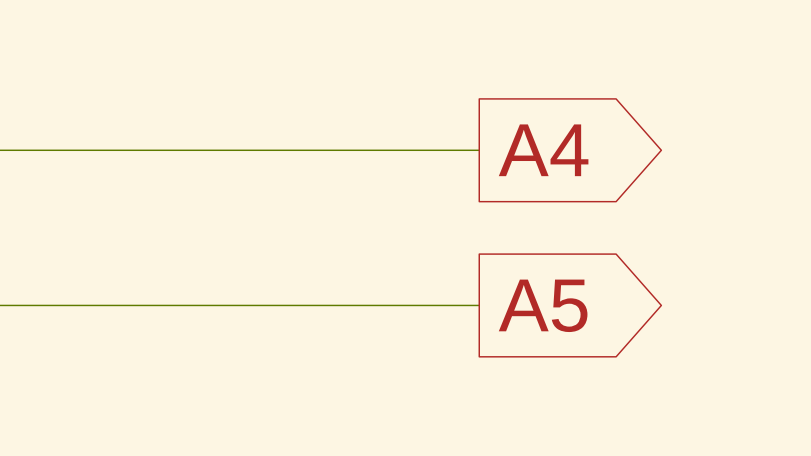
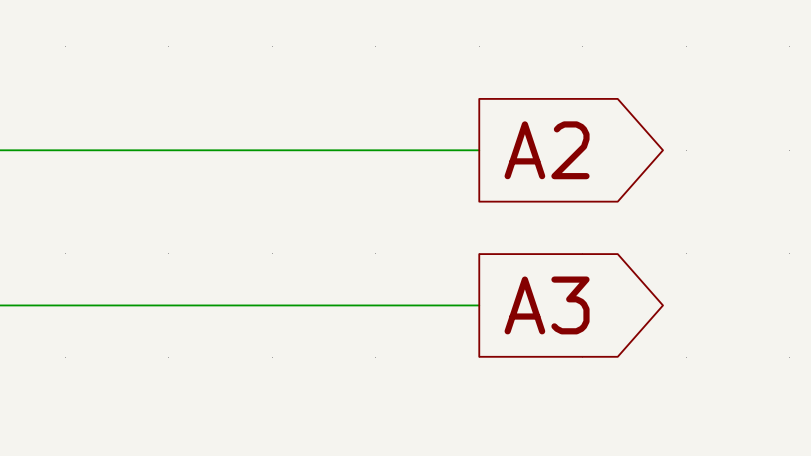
global label: A4 (543, 150) -> A2 (547, 150)
global label: A5 (543, 305) -> A3 (547, 305)

